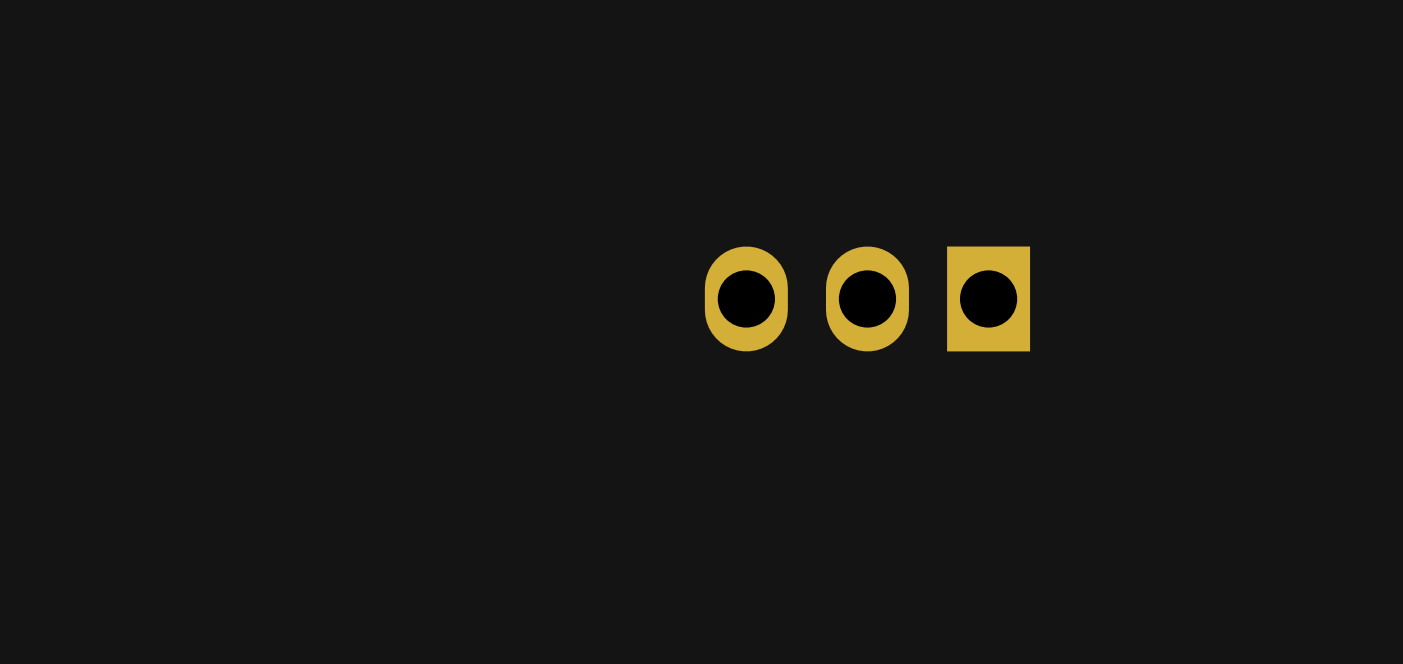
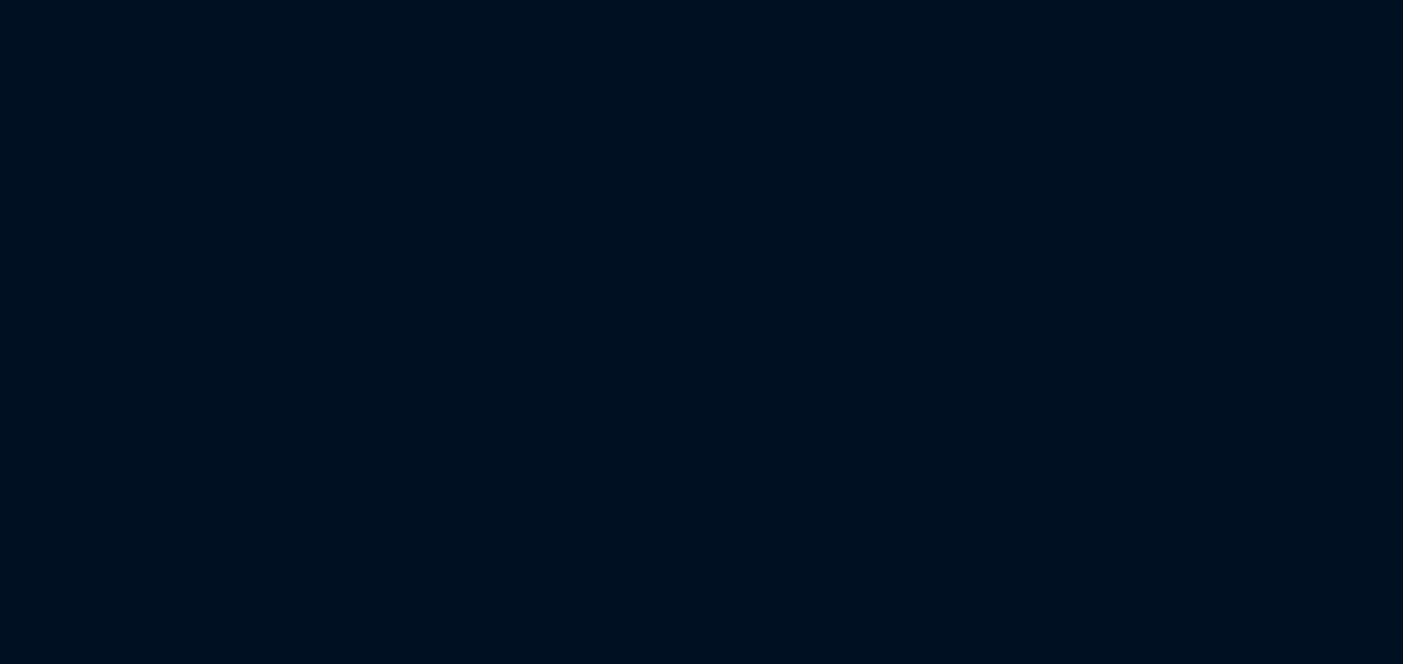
part: (867, 298) -> none

